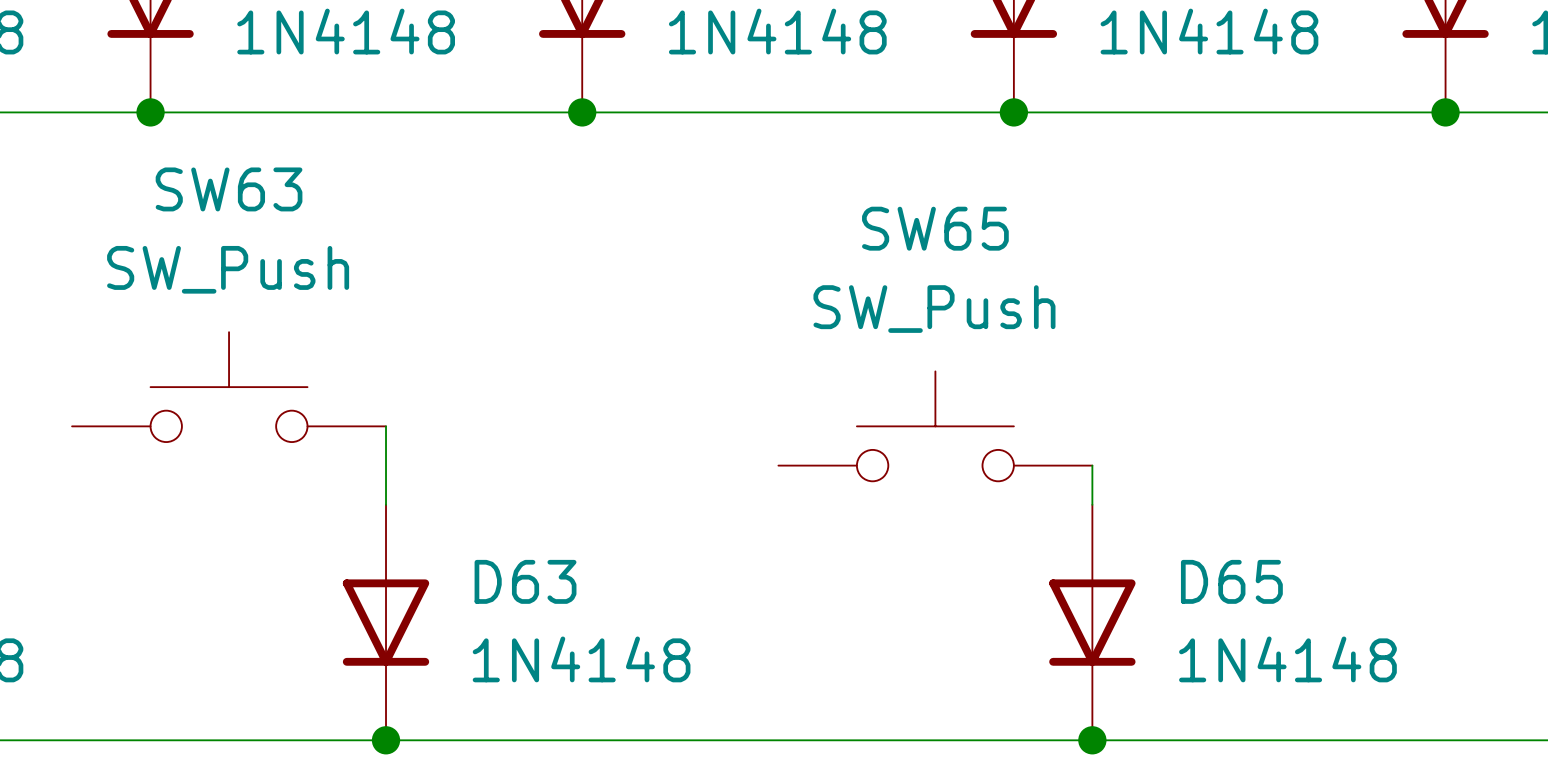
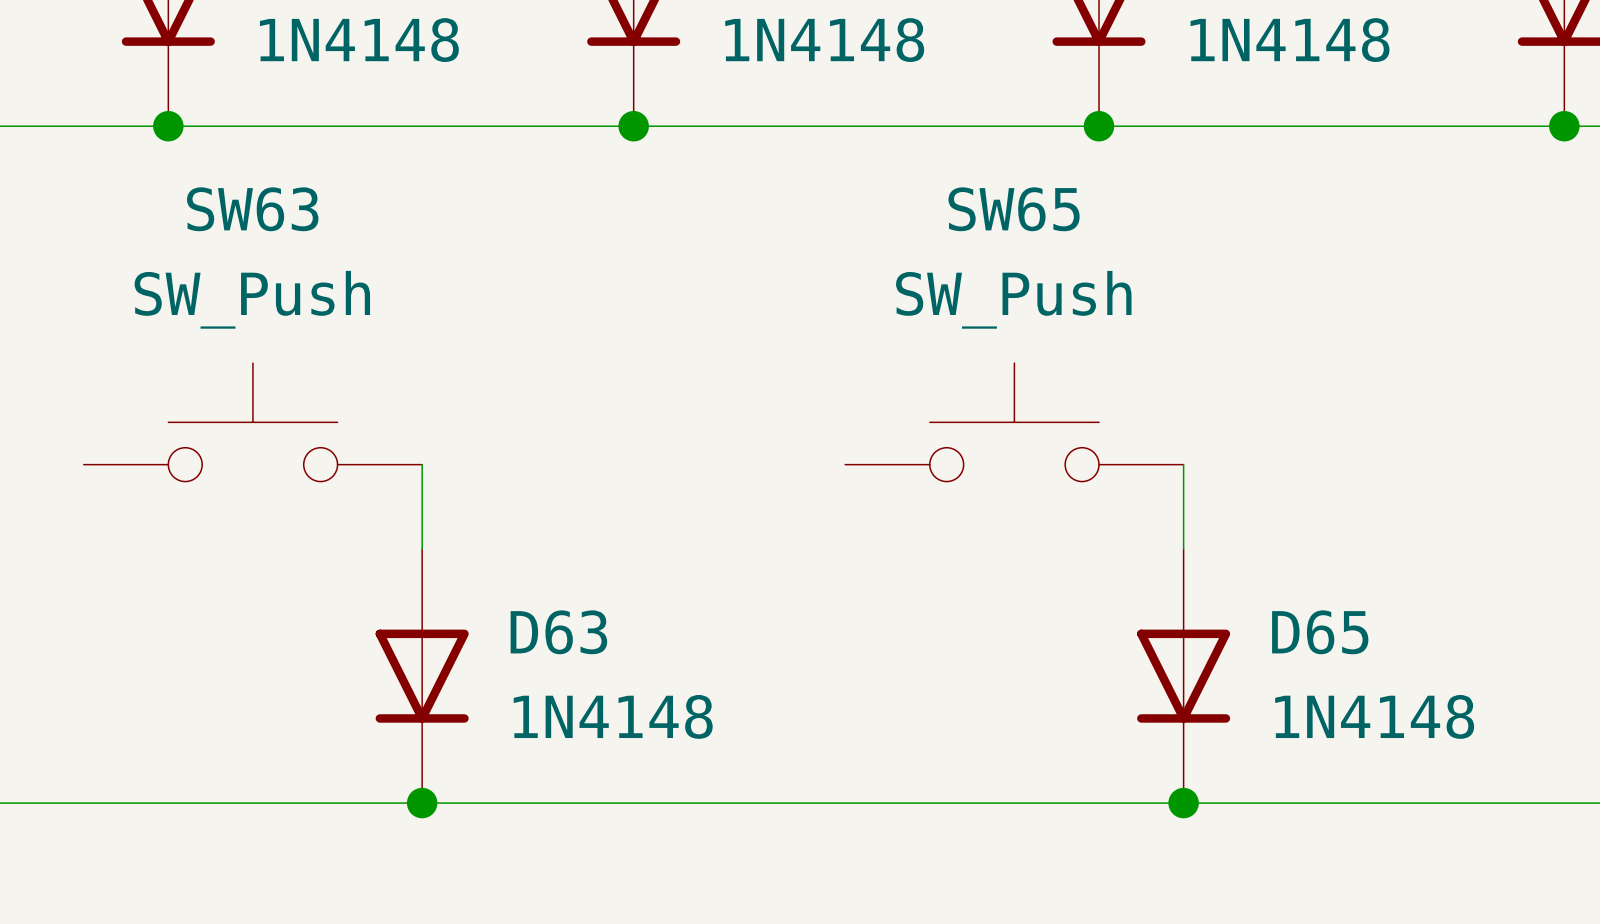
SW65 position: (935, 426) -> (1014, 422)
wire: none -> (1183, 464) (1183, 506)

